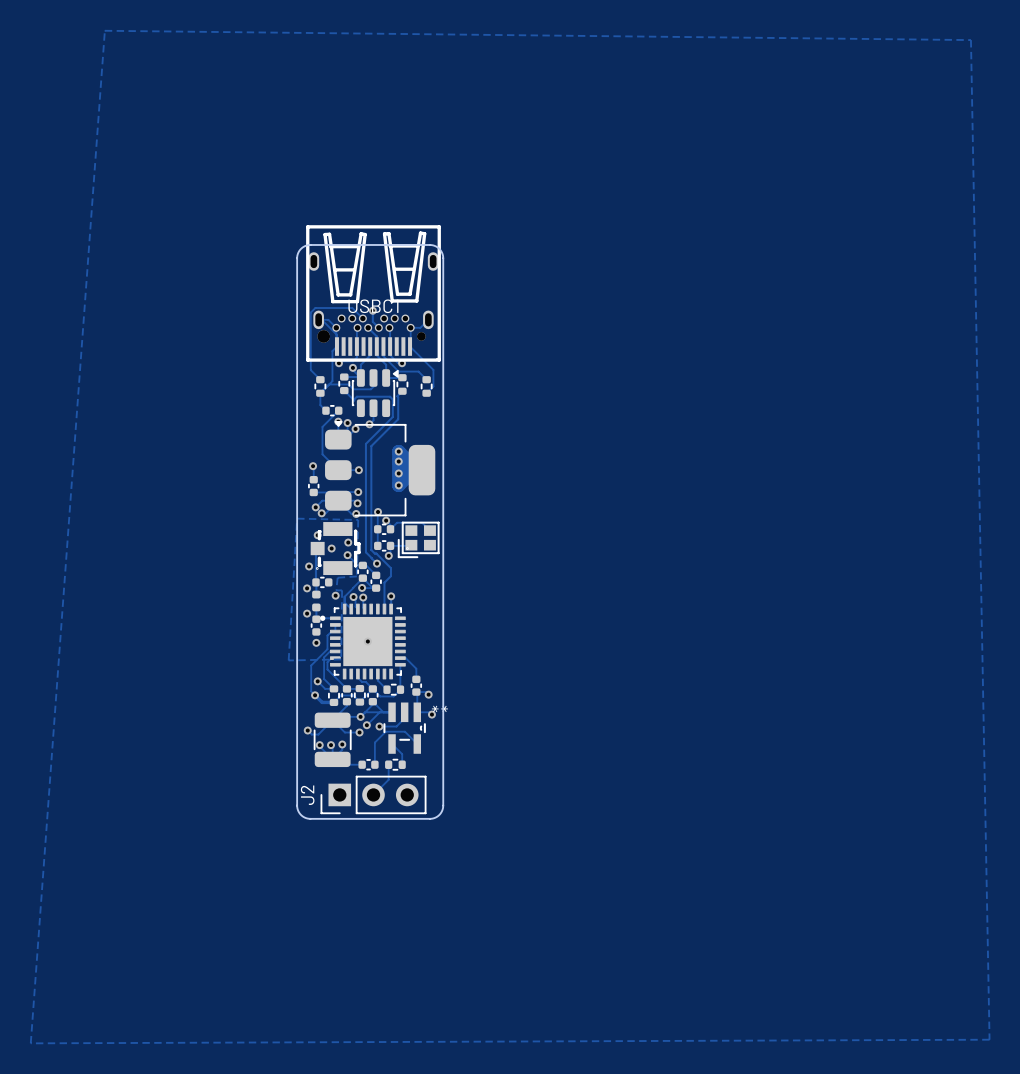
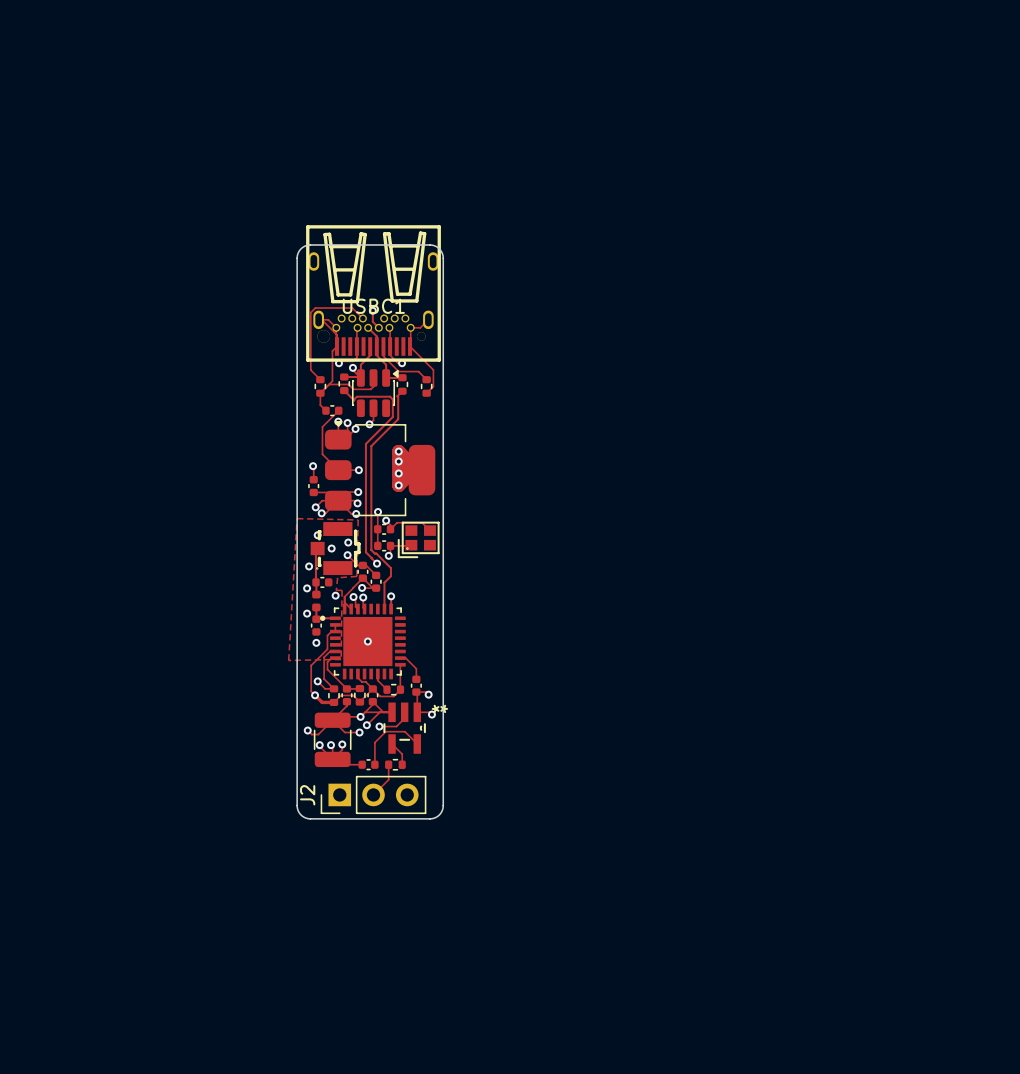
zone outline: (104, 30) (970, 40) (989, 1039) (30, 1043) (104, 30) -> none

